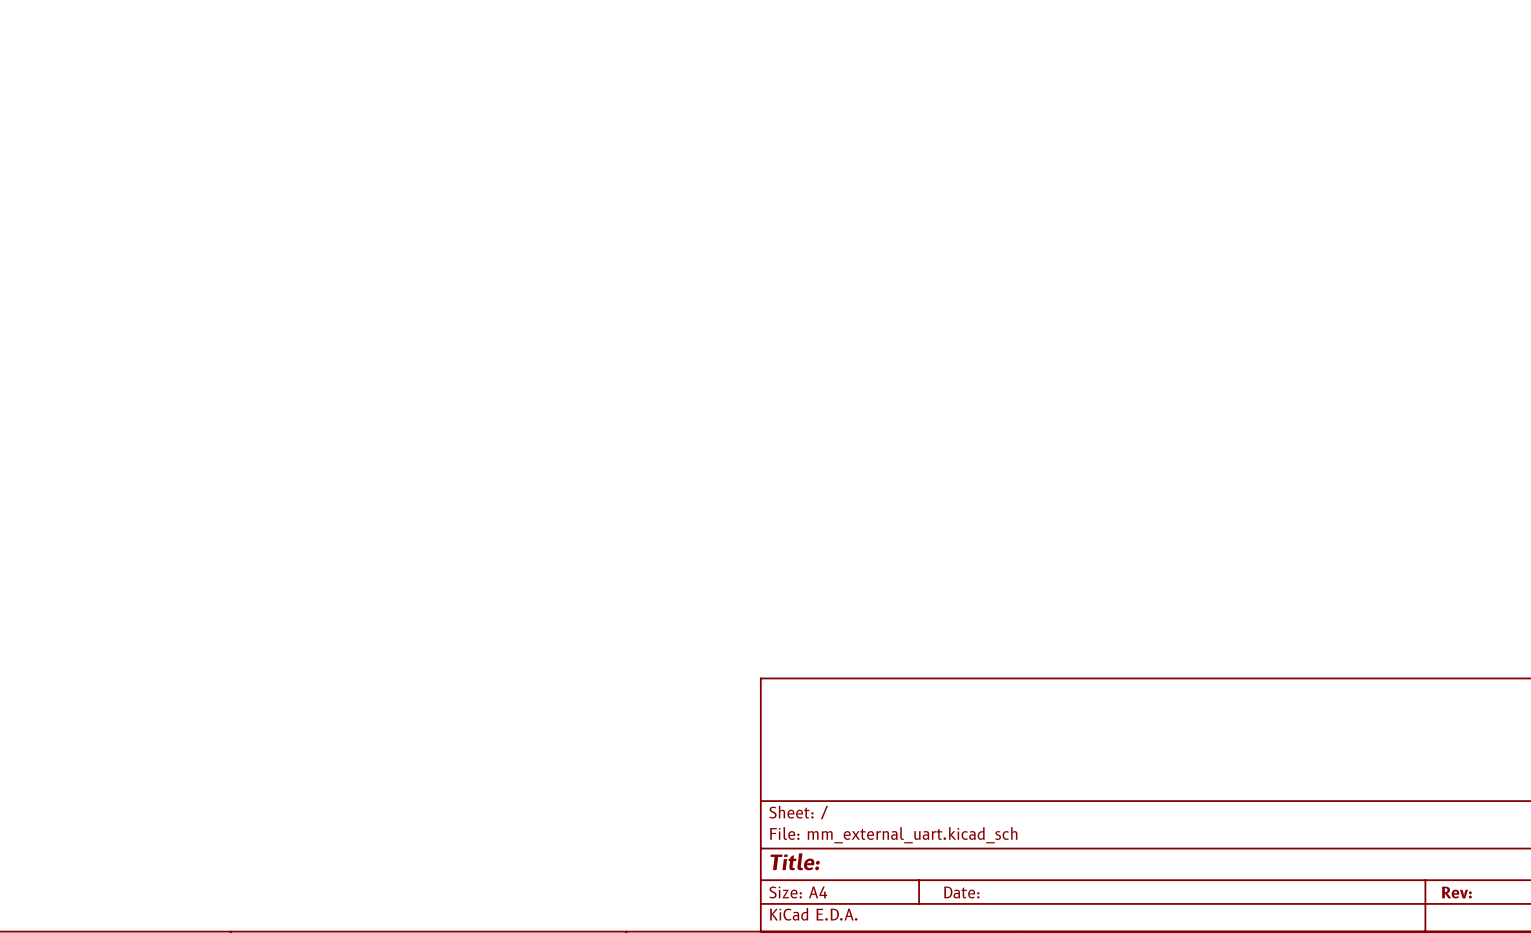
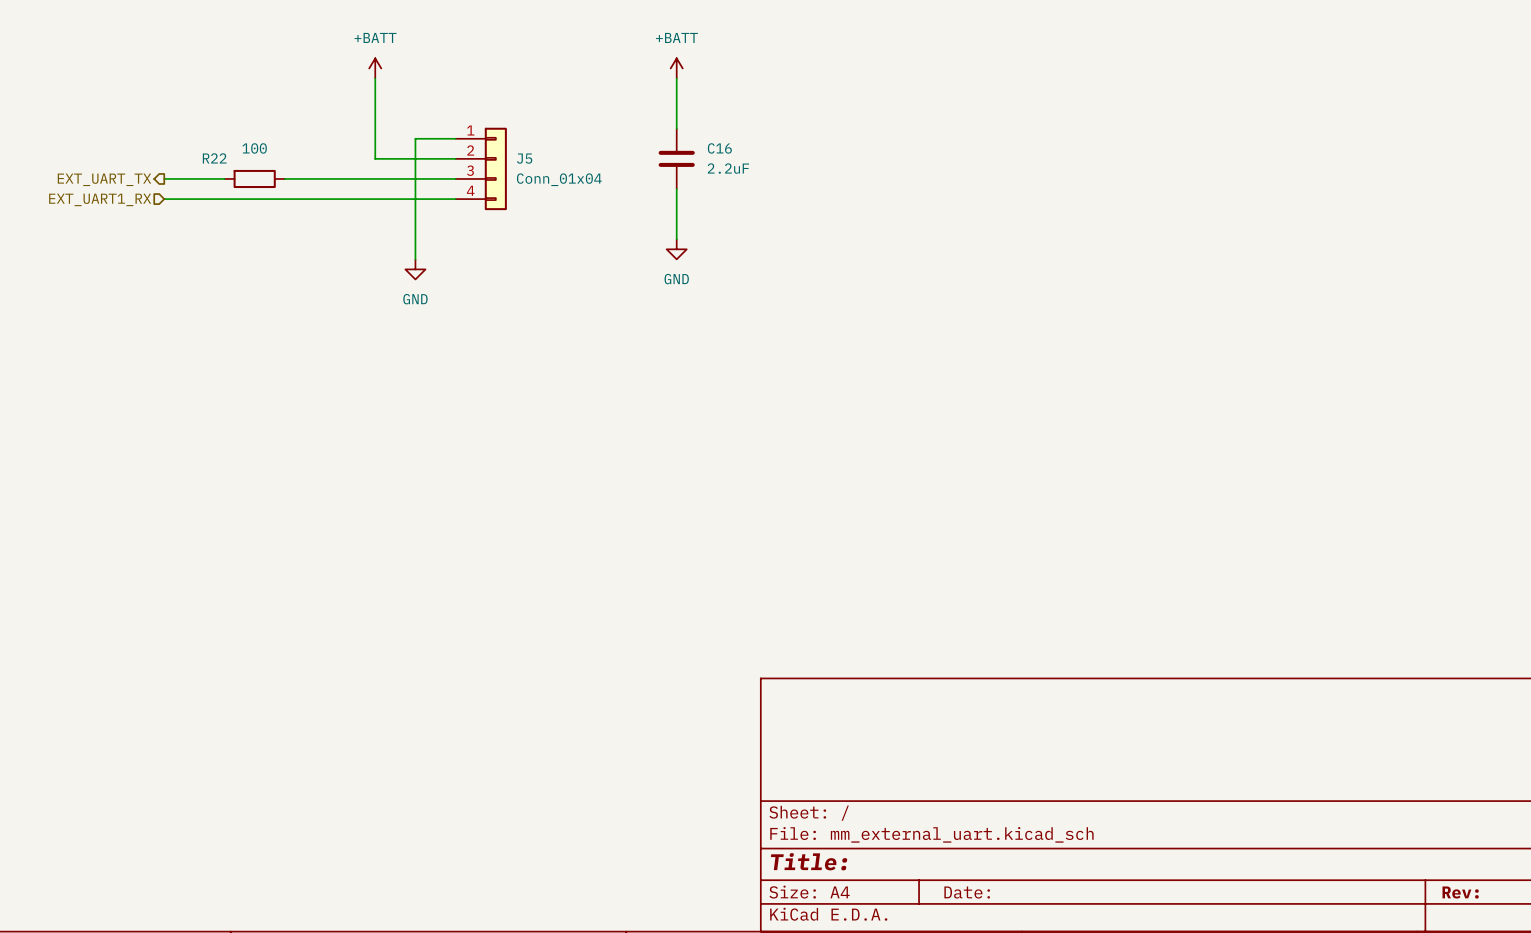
power symbol: none -> +BATT (375, 68)
power symbol: none -> +BATT (676, 68)
wire: none -> (375, 78) (375, 158) (455, 158)
wire: none -> (676, 78) (676, 128)
wire: none -> (455, 138) (415, 138) (415, 259)
C16: none -> 2.2uF (676, 158)
J5: none -> Conn_01x04 (481, 168)
wire: none -> (164, 178) (224, 178)
R22: none -> 100 (254, 178)
wire: none -> (284, 178) (455, 178)
hierarchical label: none -> EXT_UART_TX (104, 179)
wire: none -> (676, 189) (676, 239)
wire: none -> (164, 199) (455, 199)
hierarchical label: none -> EXT_UART1_RX (100, 199)
power symbol: none -> GND (676, 249)
power symbol: none -> GND (415, 269)

